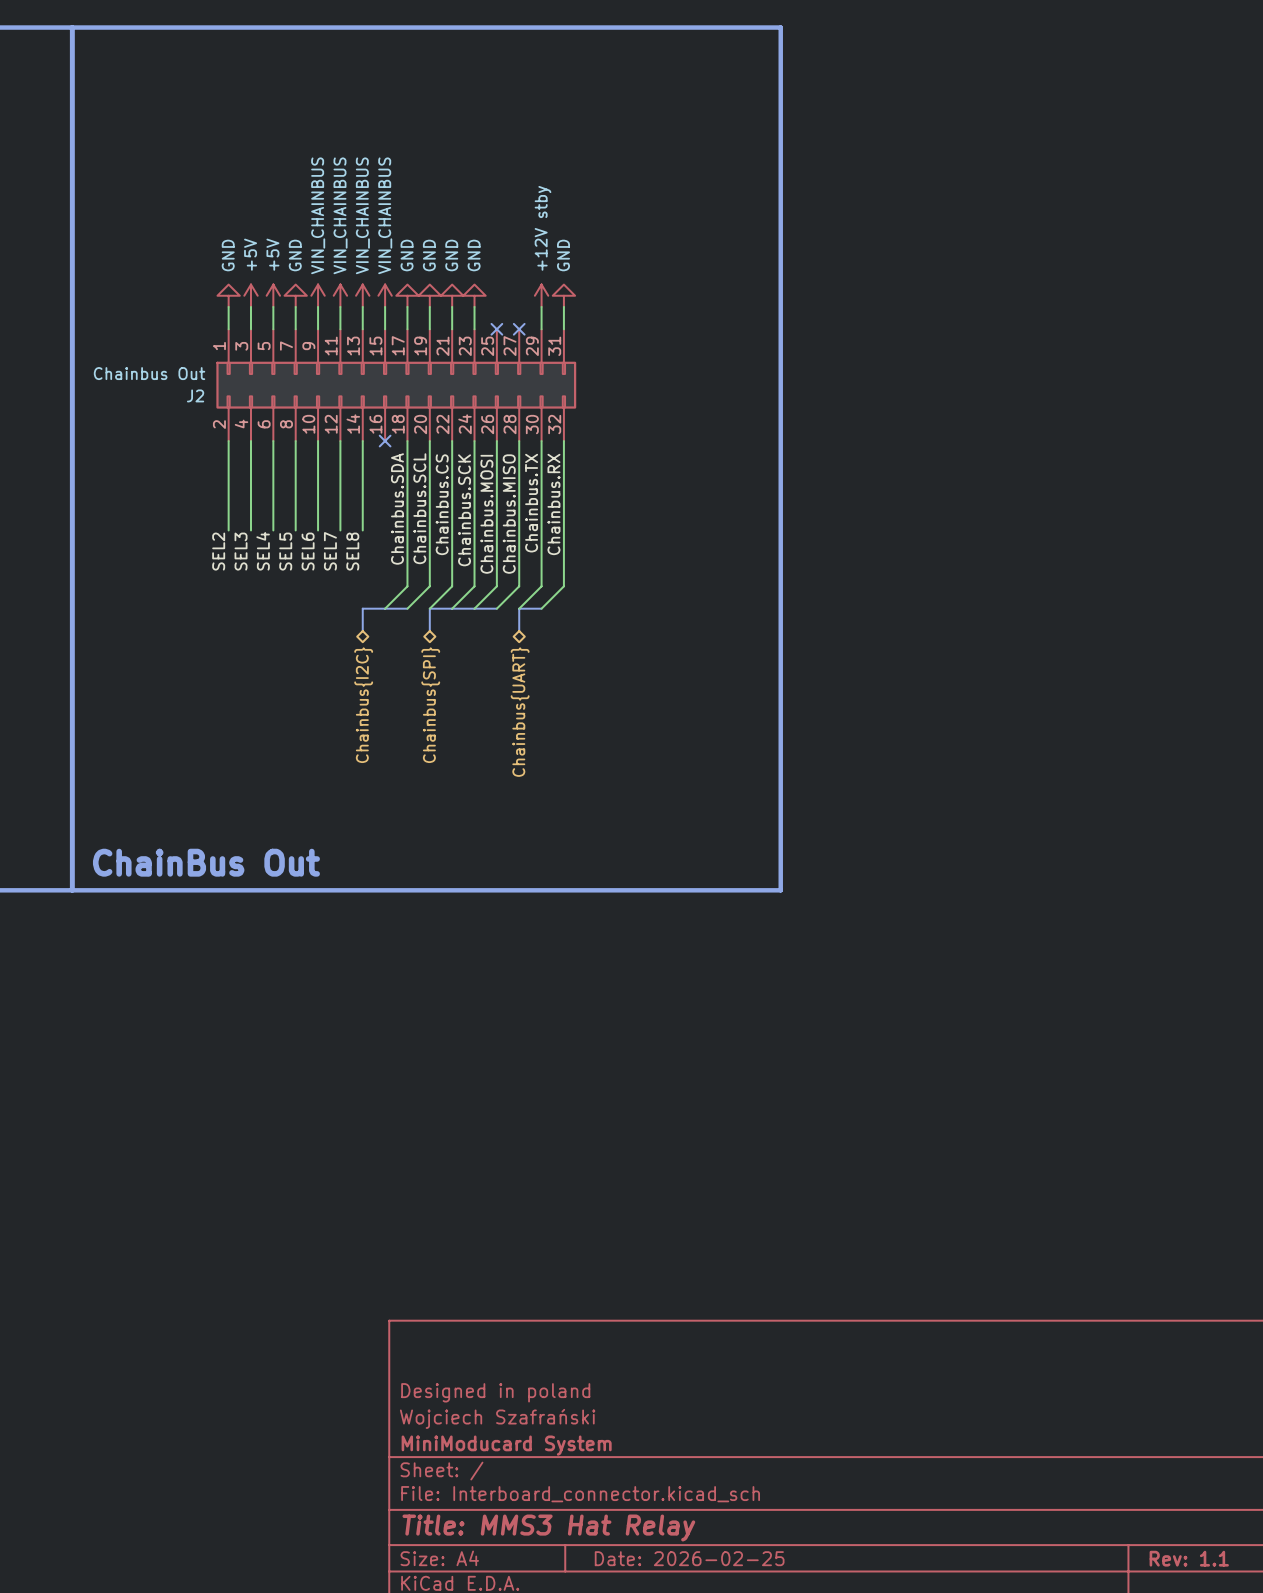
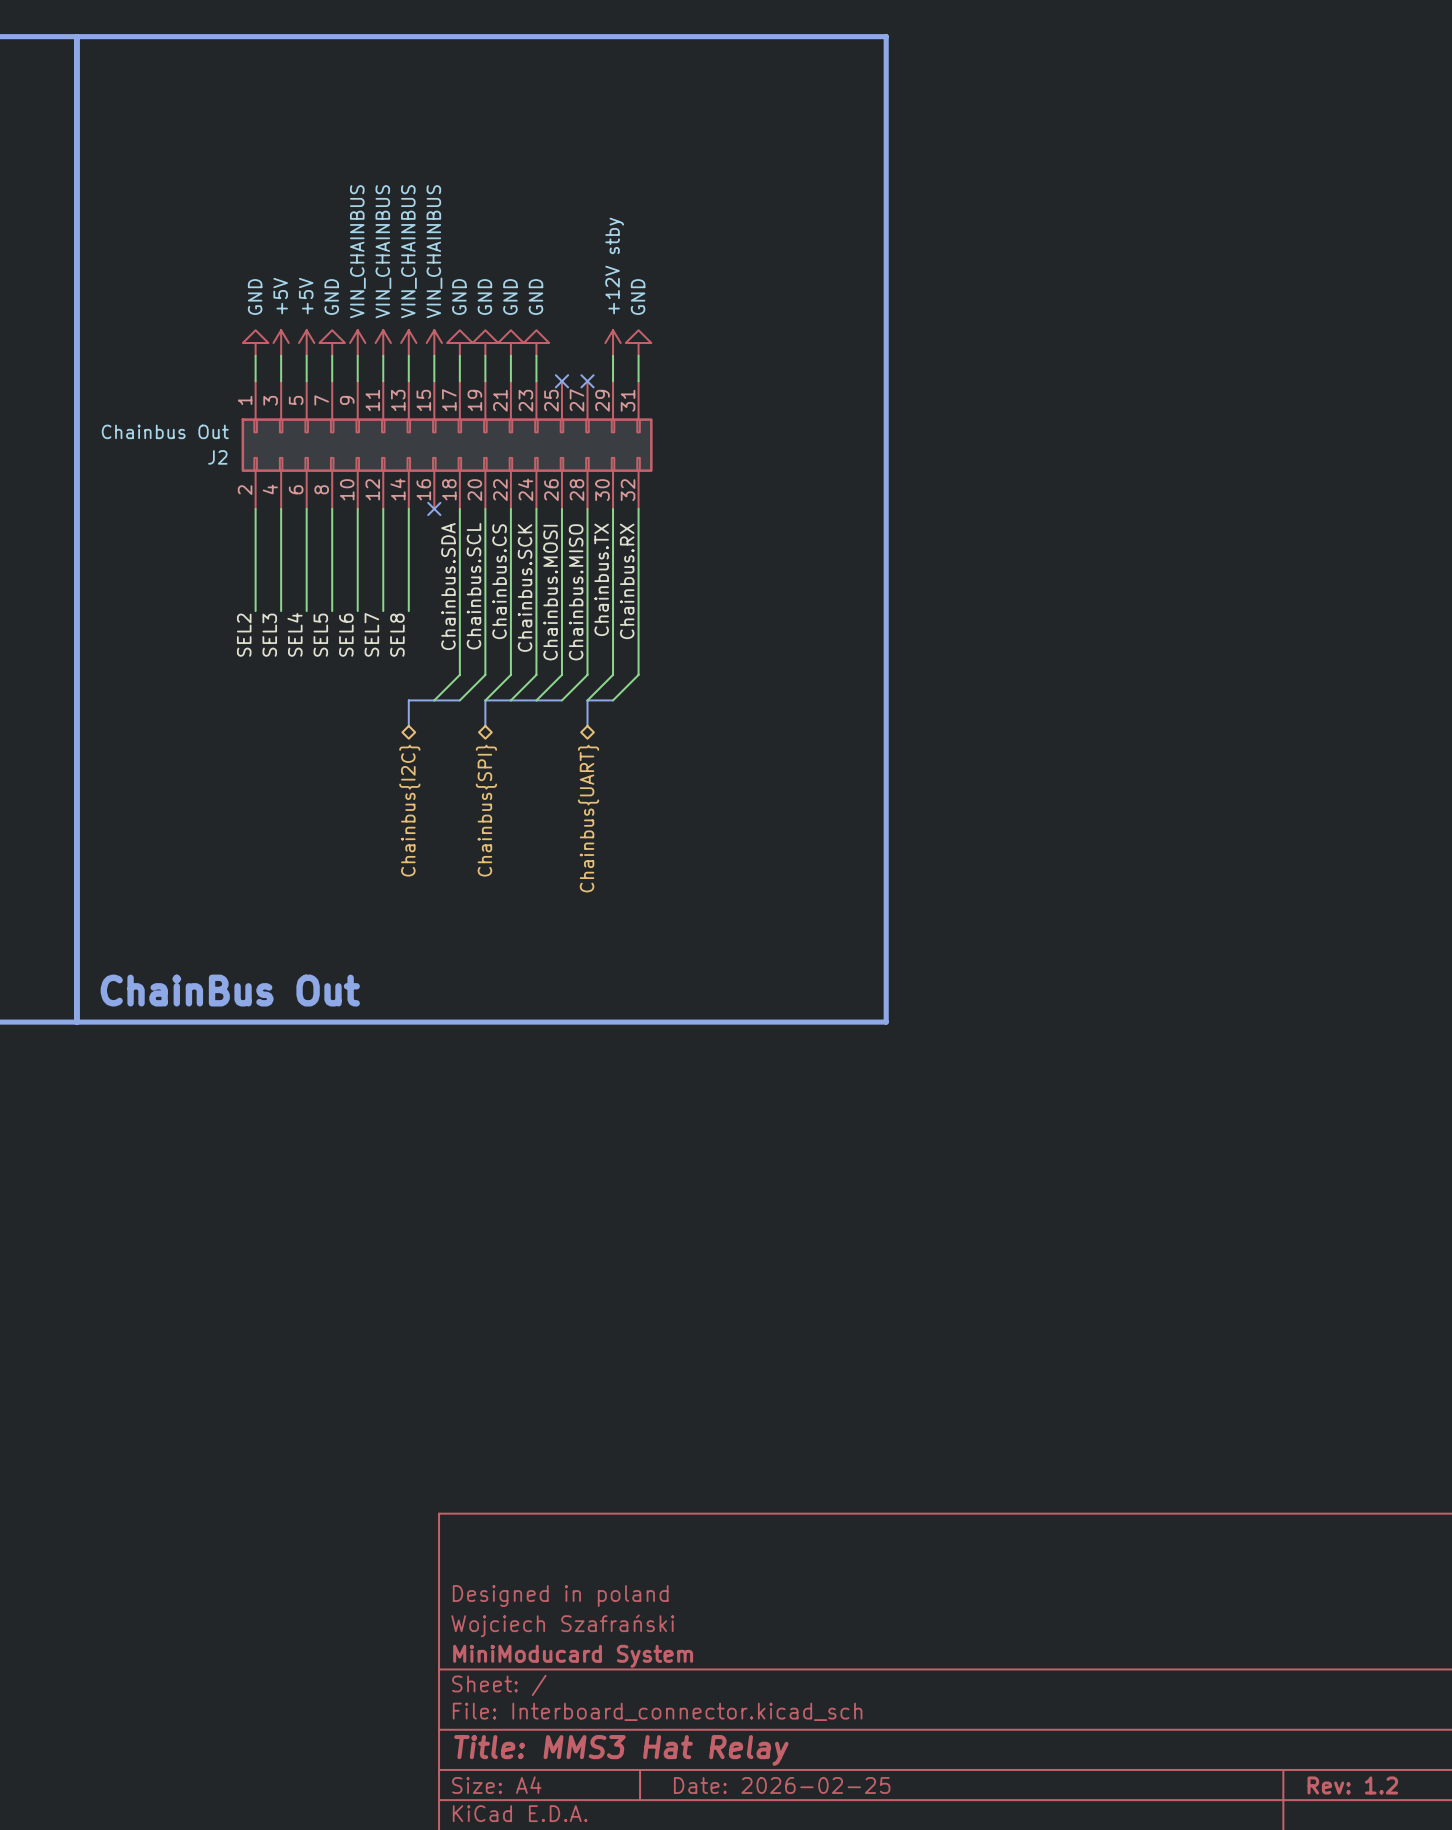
title block: Rev: 1.1 (1189, 1558) -> Rev: 1.2 (1352, 1785)

